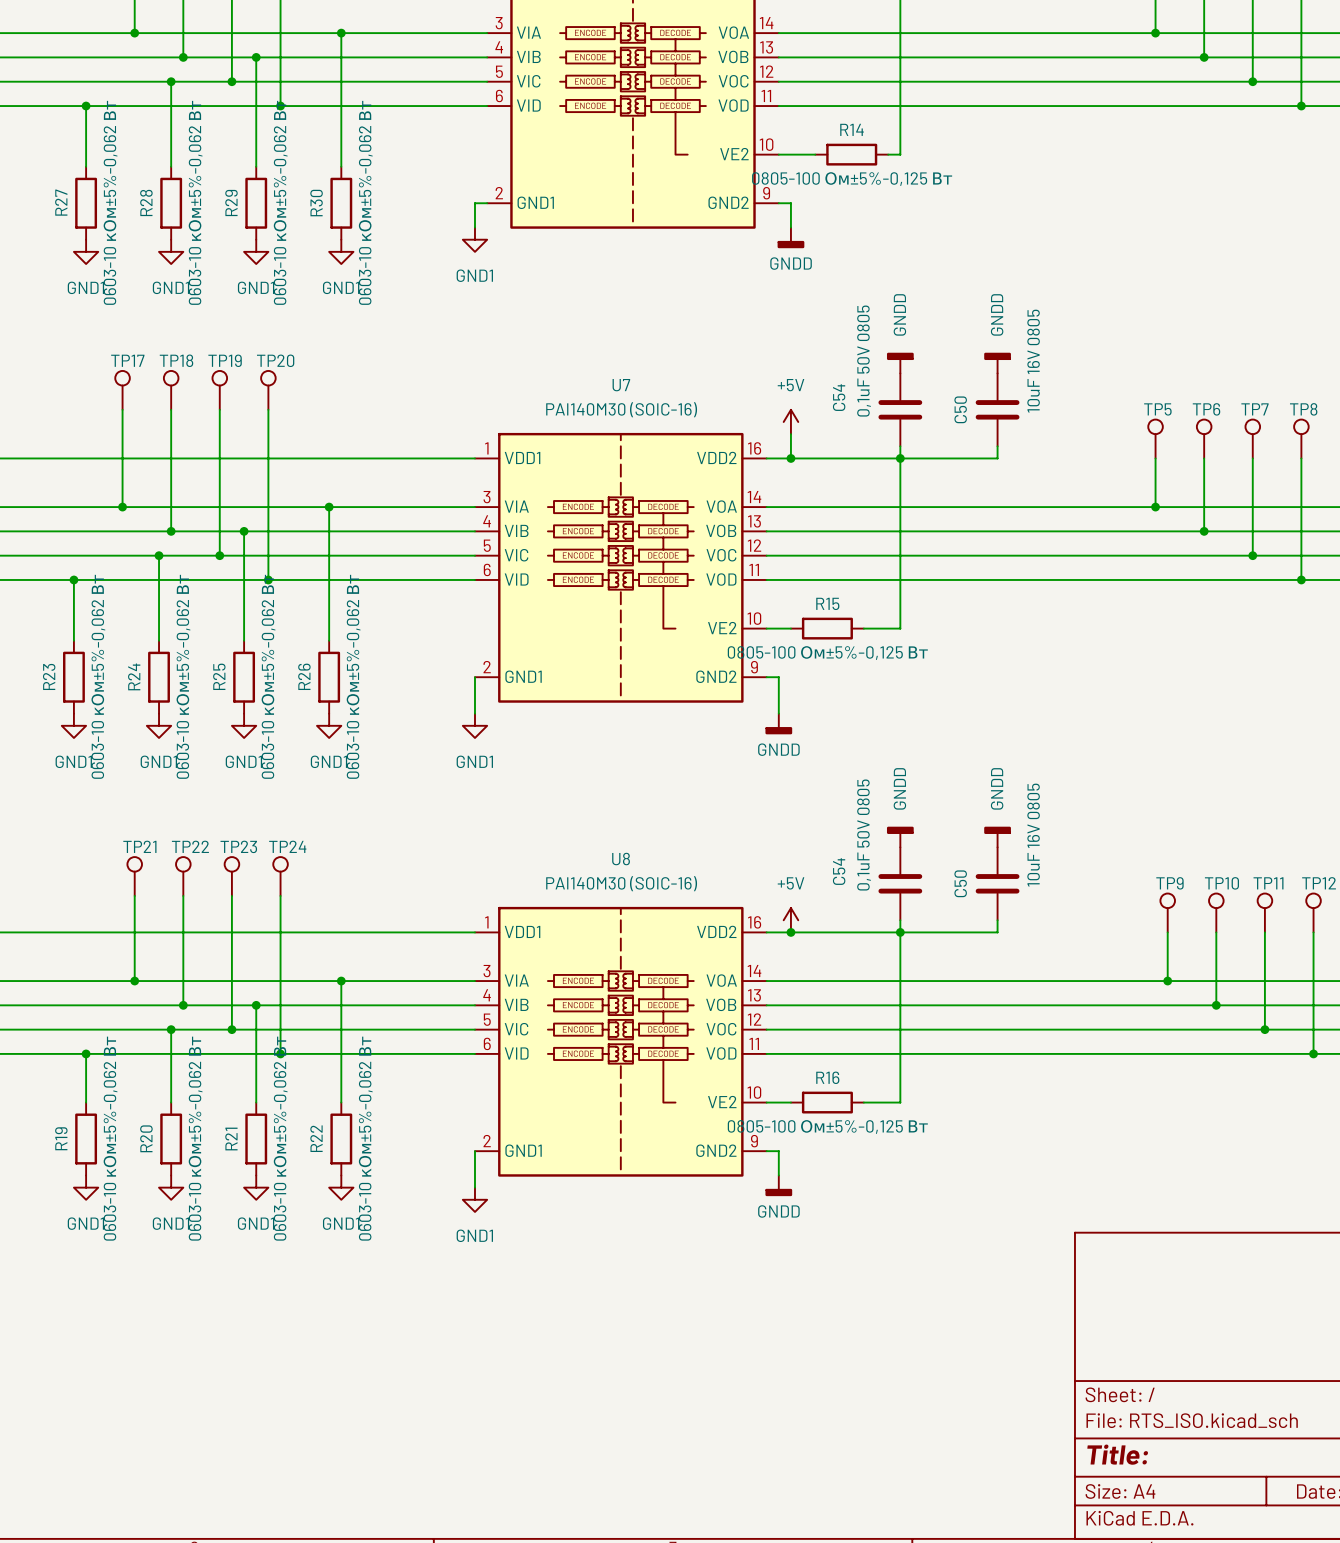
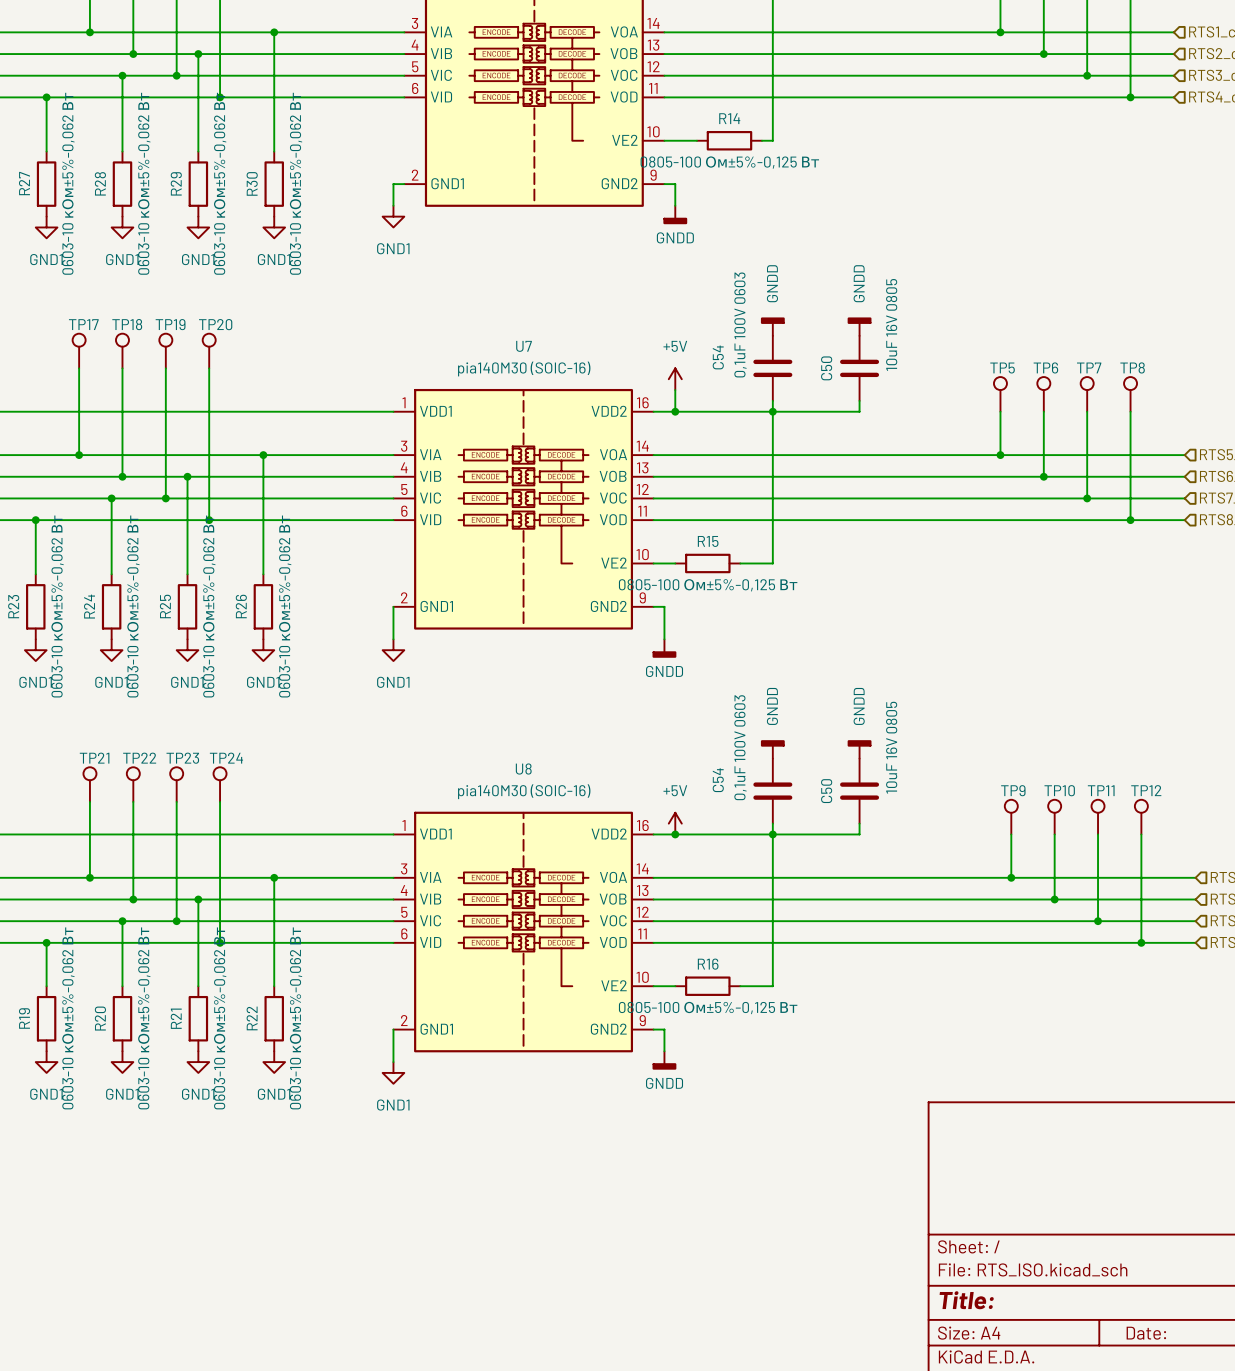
C54 value: 0,1uF 50V 0805 (864, 361) -> 0,1uF 100V 0603 (740, 324)
U7 value: PAI140M30 (SOIC-16) (621, 409) -> pia140M30 (SOIC-16) (524, 368)
C54 value: 0,1uF 50V 0805 (864, 835) -> 0,1uF 100V 0603 (740, 747)
U8 value: PAI140M30 (SOIC-16) (621, 883) -> pia140M30 (SOIC-16) (524, 791)

